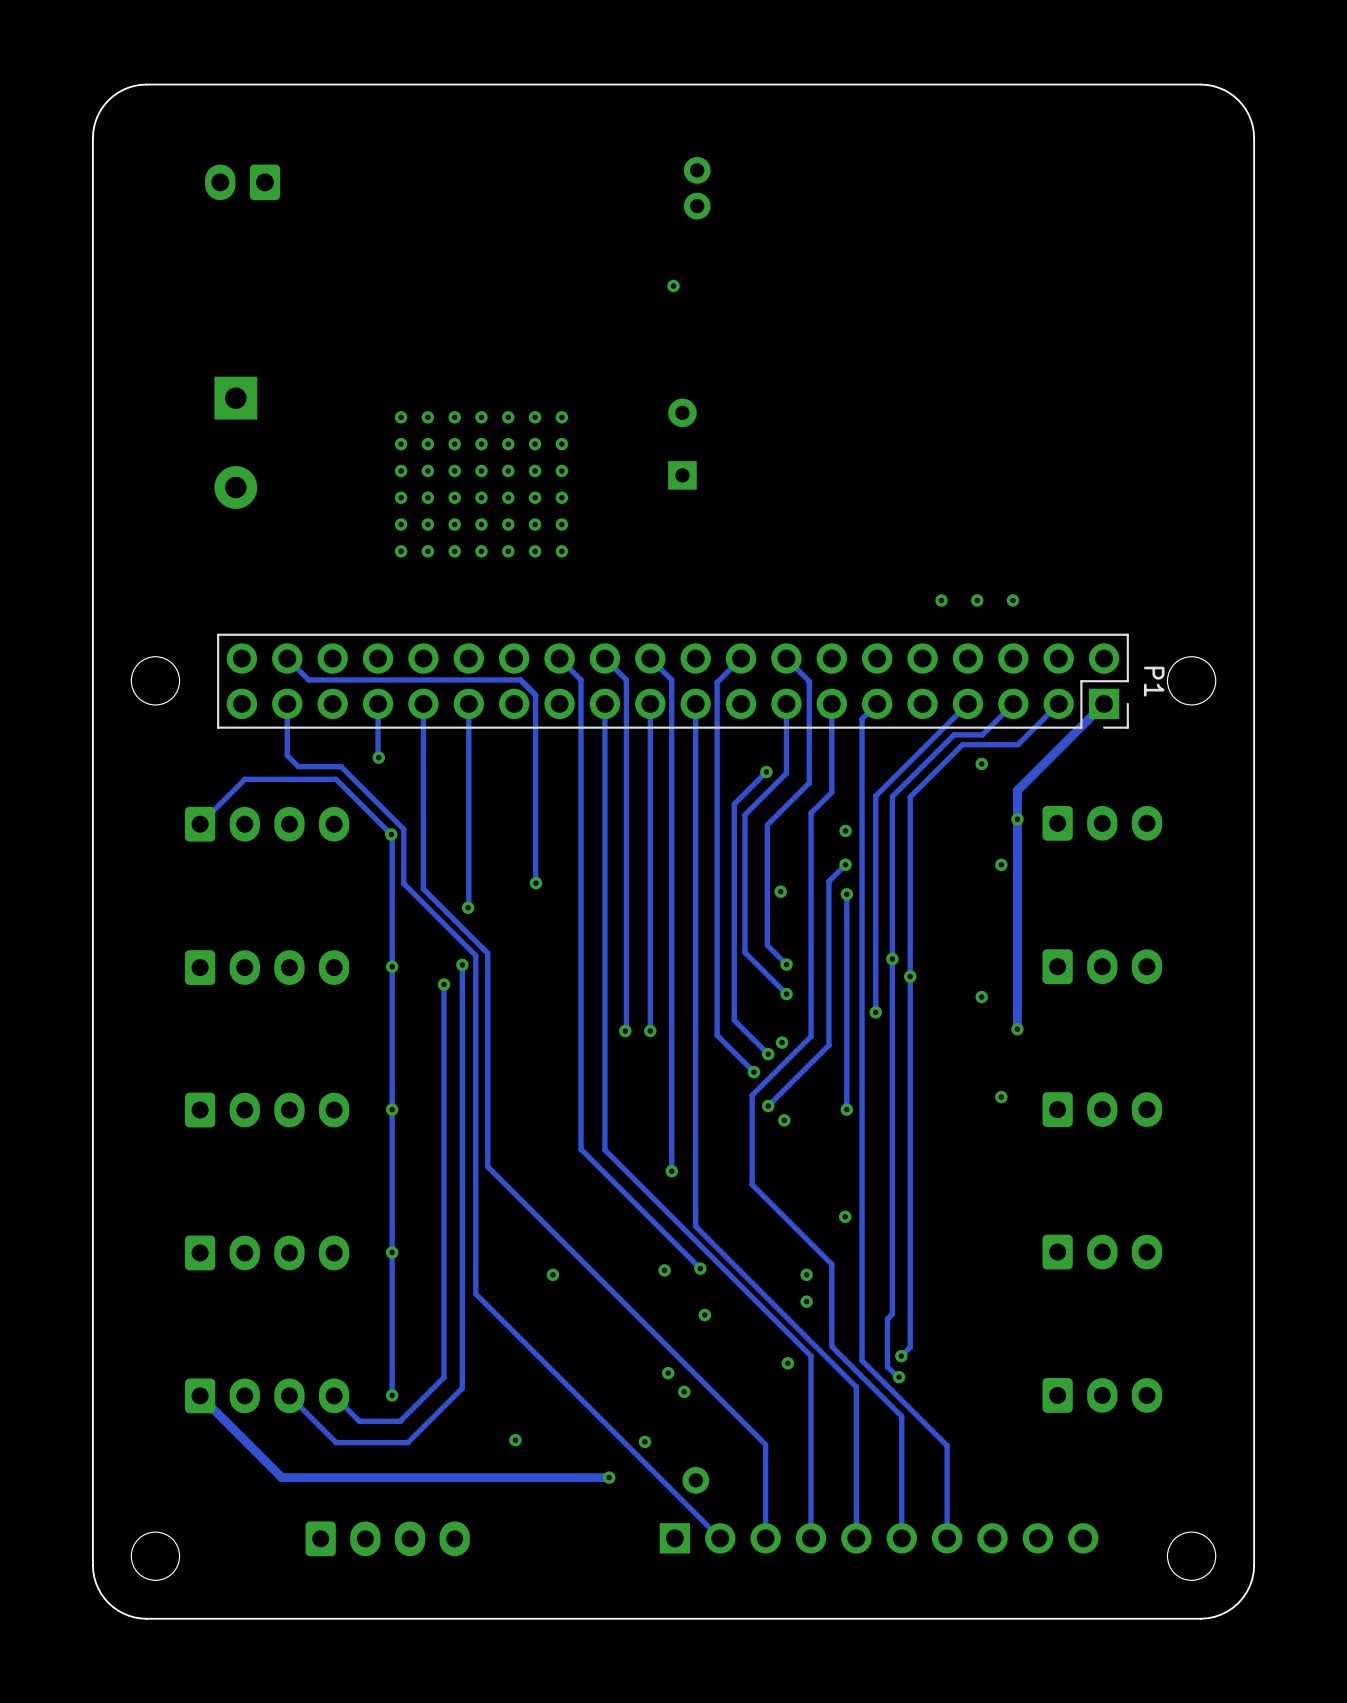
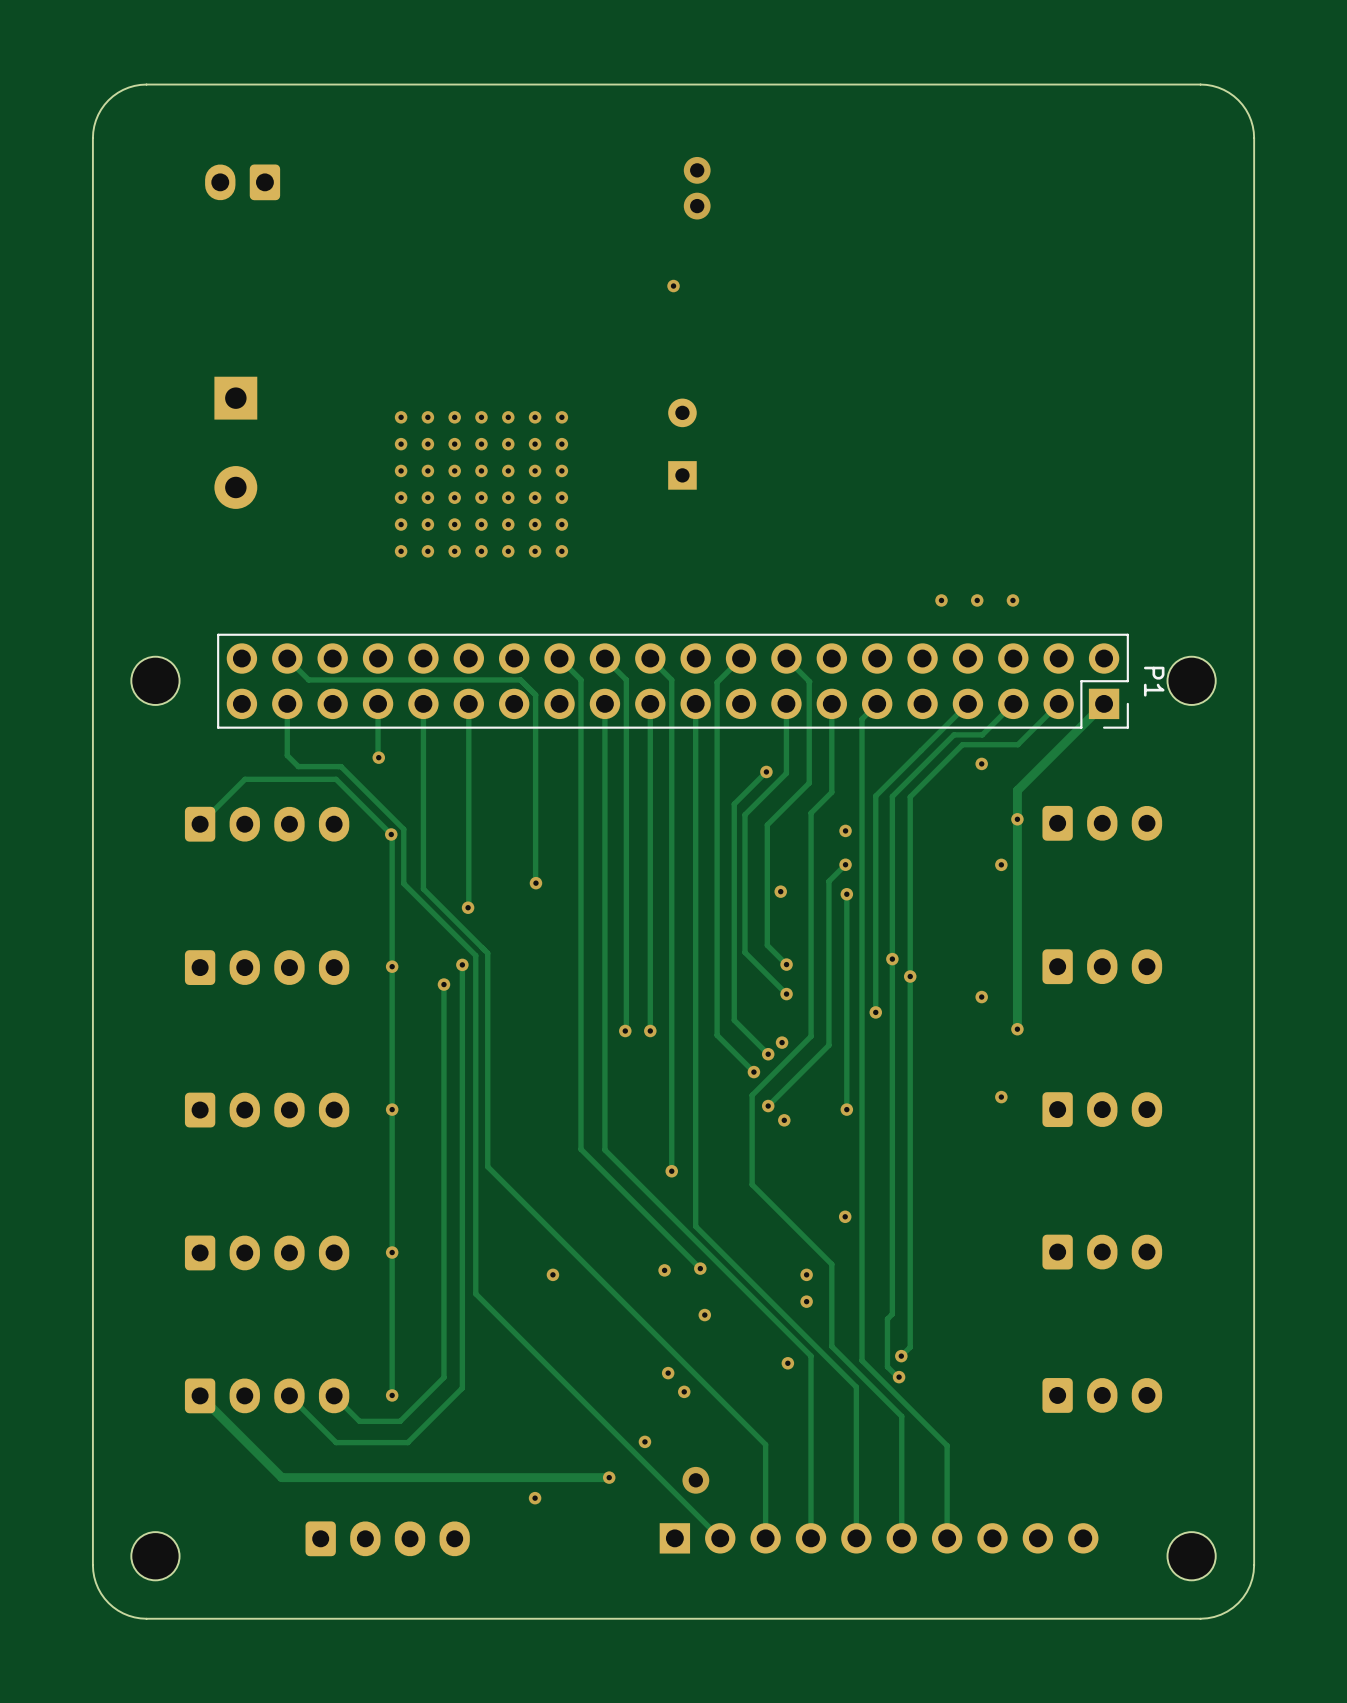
via position: (515, 1440) -> (535, 1498)

